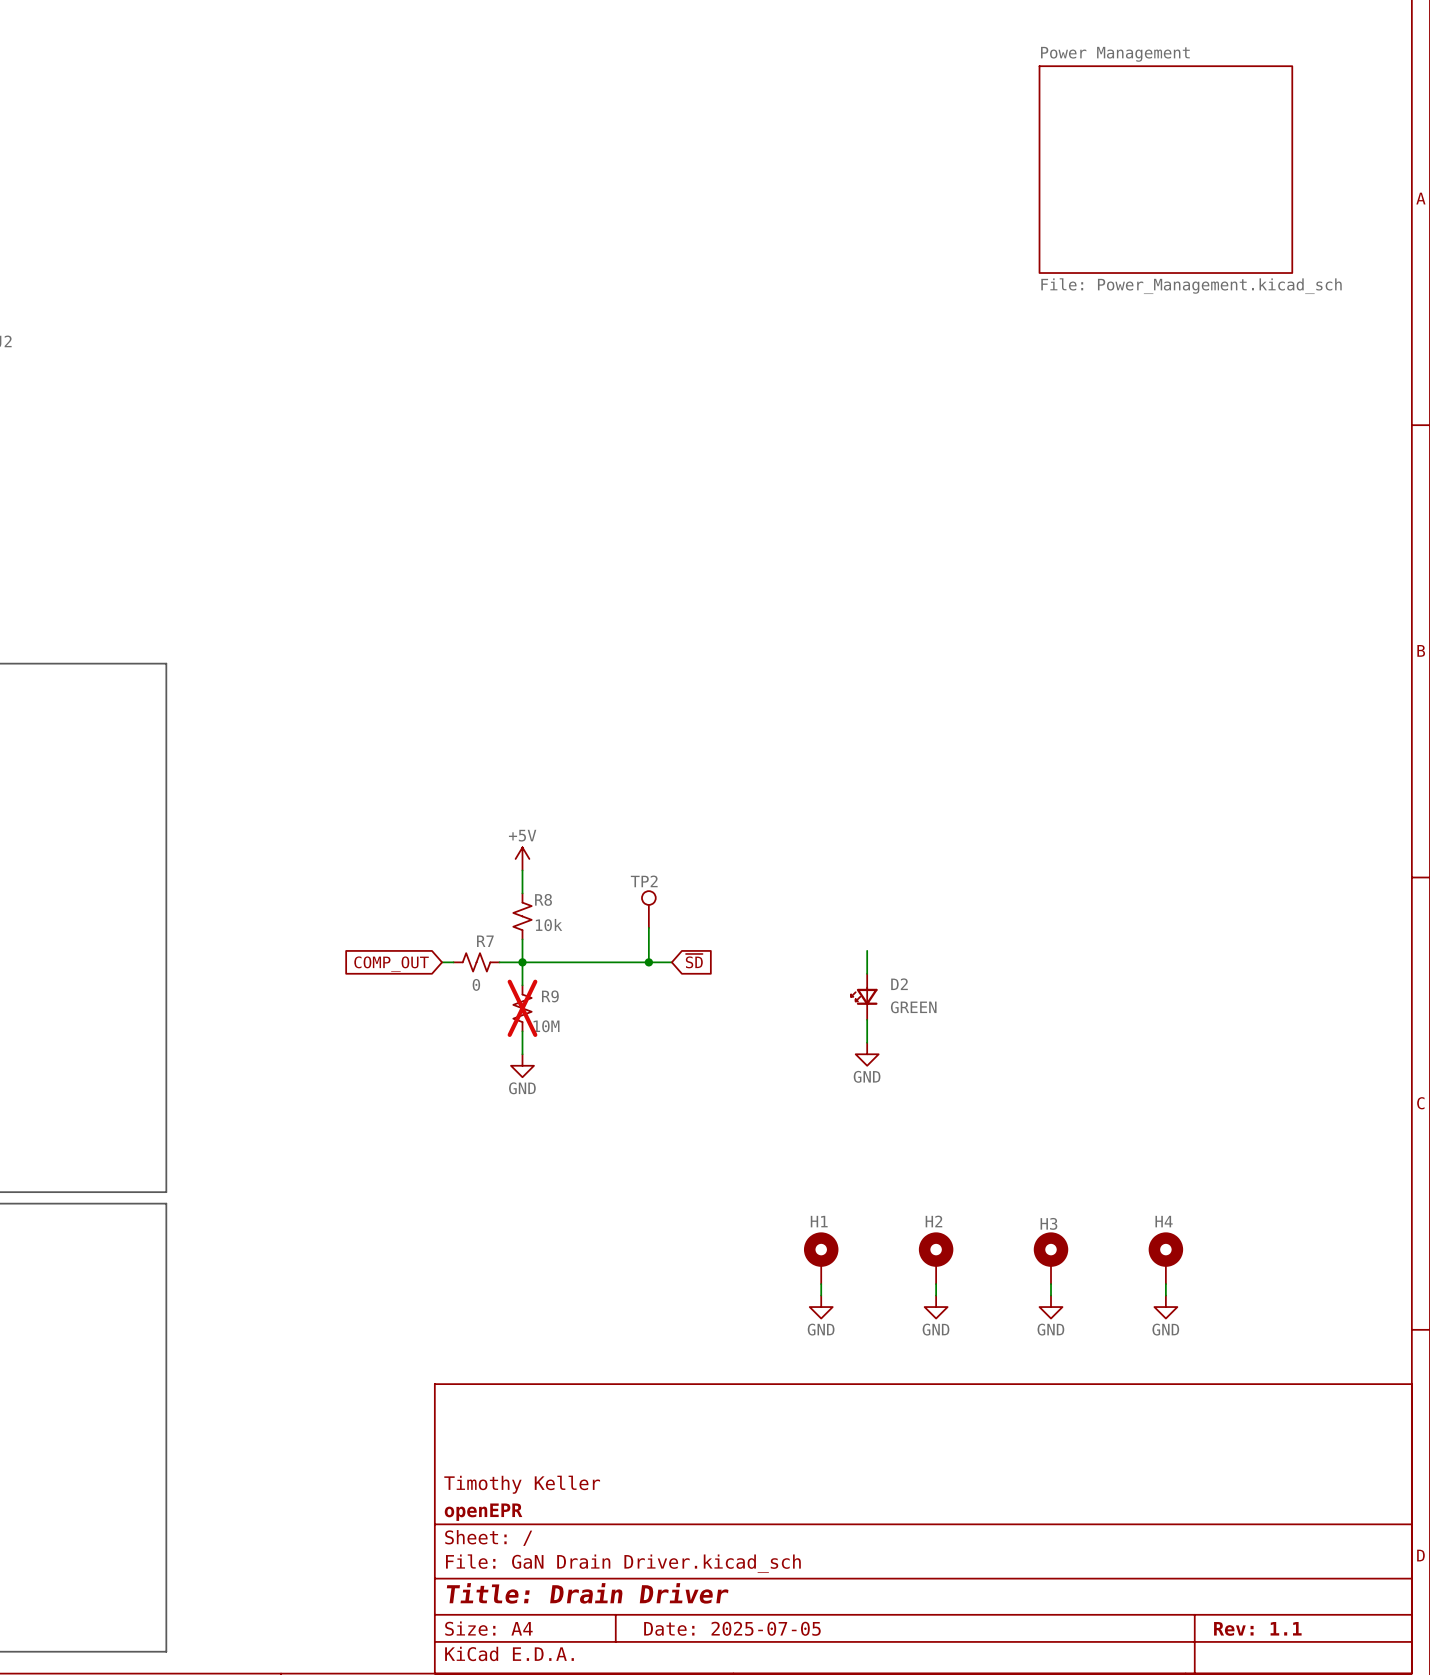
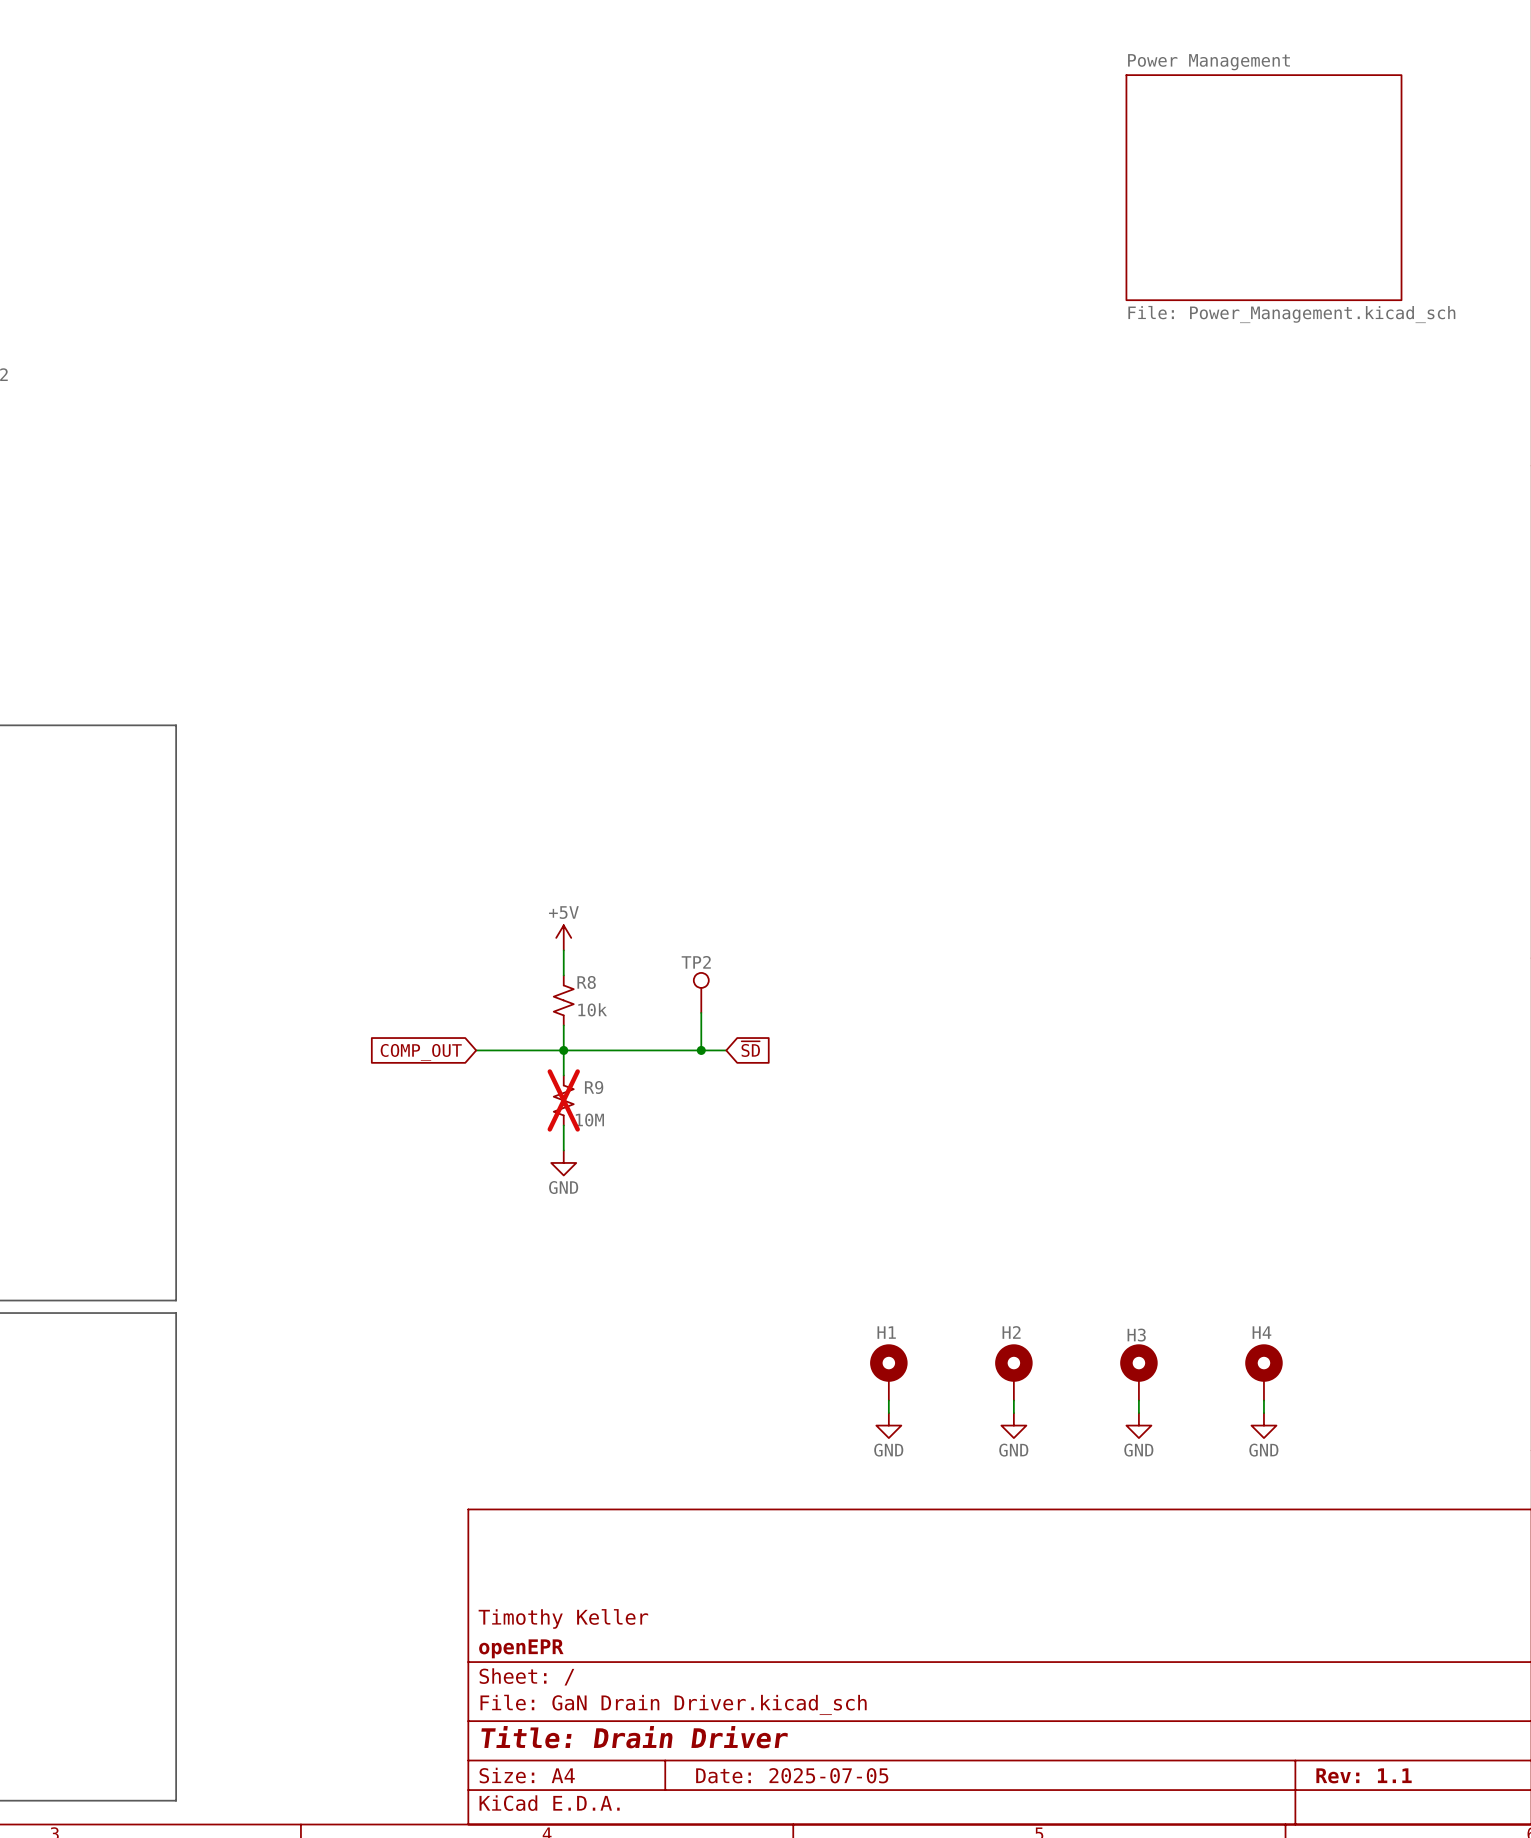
wire: (867, 950) (867, 973) -> none
R7: 0 (476, 962) -> none
D2: GREEN (864, 996) -> none
wire: (867, 1019) (867, 1042) -> none
power symbol: GND (867, 1054) -> none

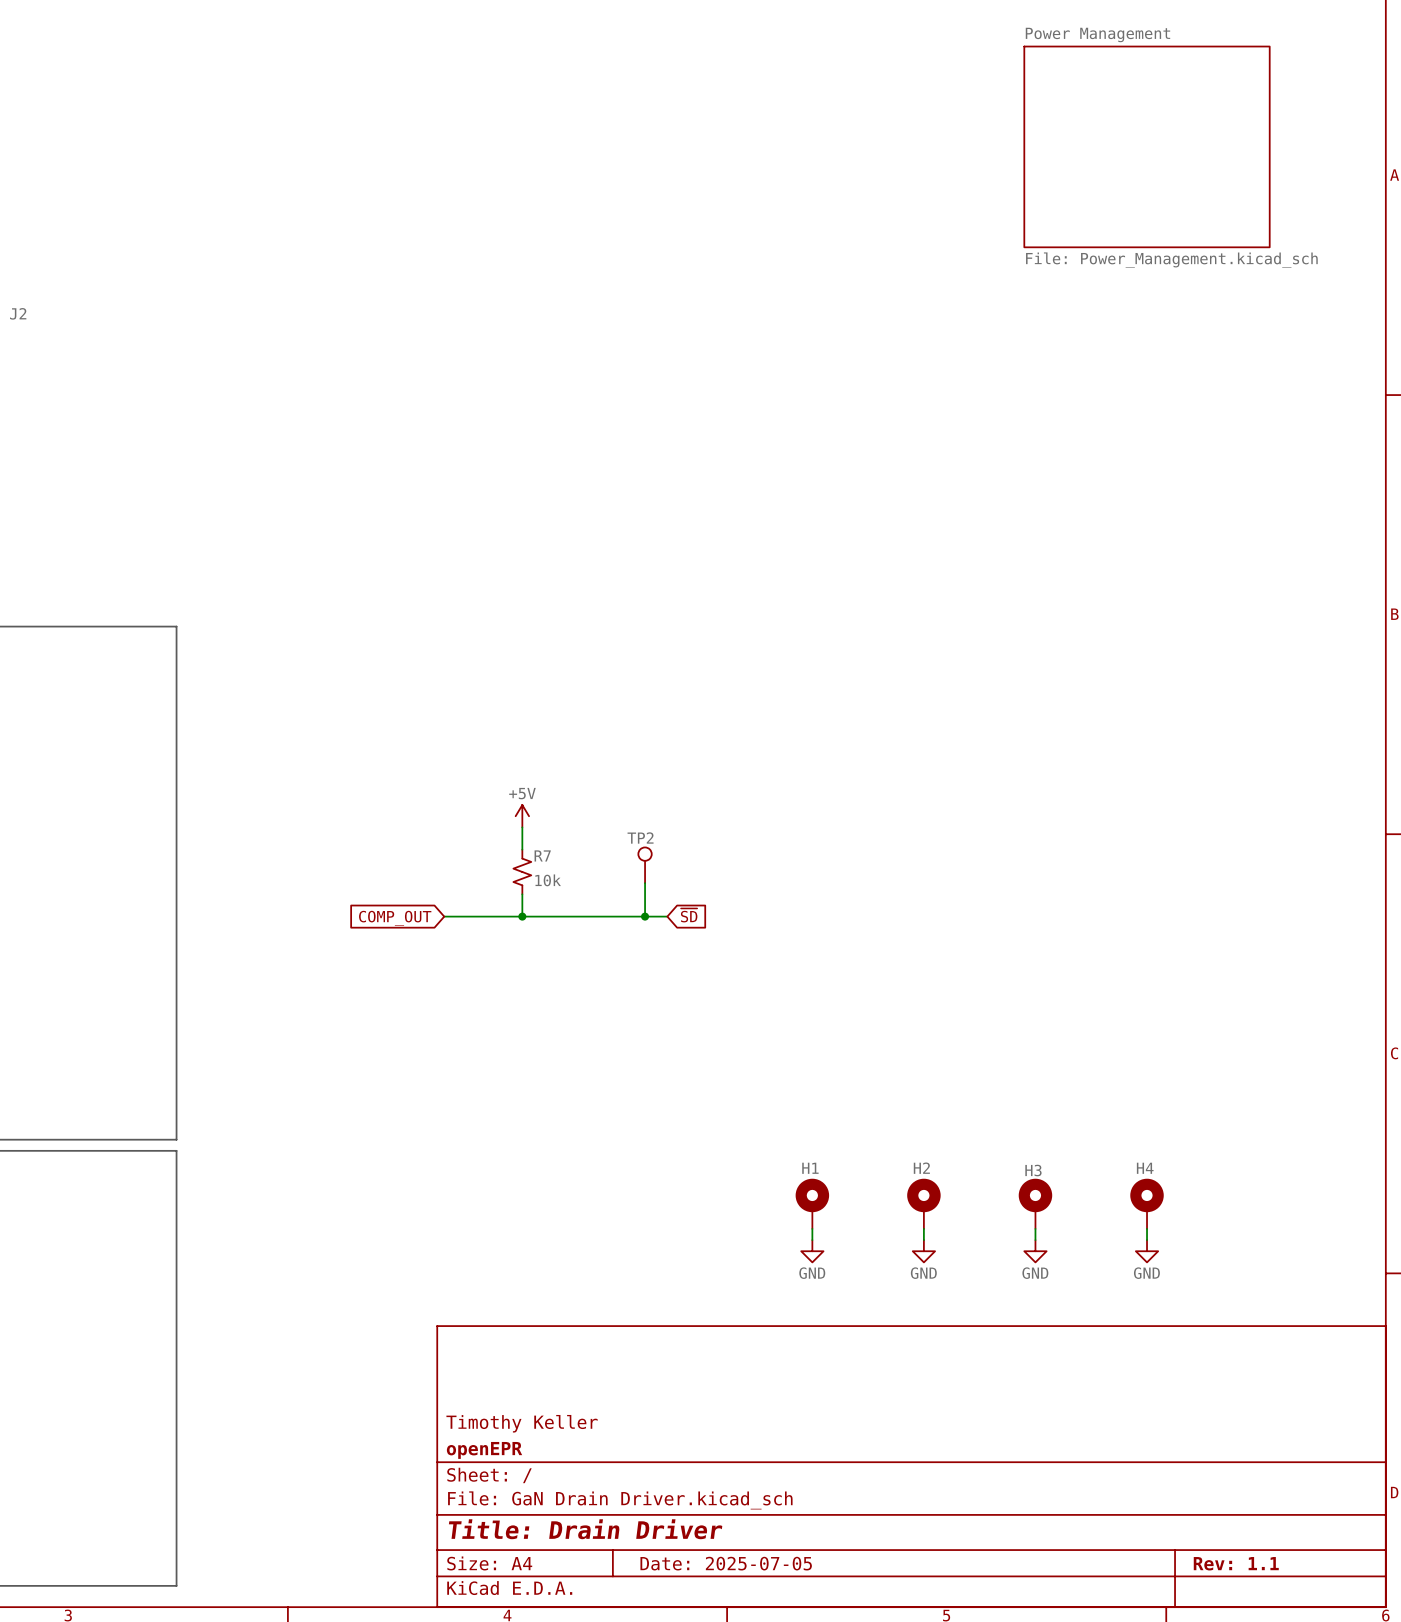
R8 name: R8 (586, 982) -> R7 (542, 855)
wire: (563, 1050) (563, 1075) -> none
R9: 10M (563, 1100) -> none
wire: (563, 1125) (563, 1150) -> none
power symbol: GND (563, 1162) -> none

